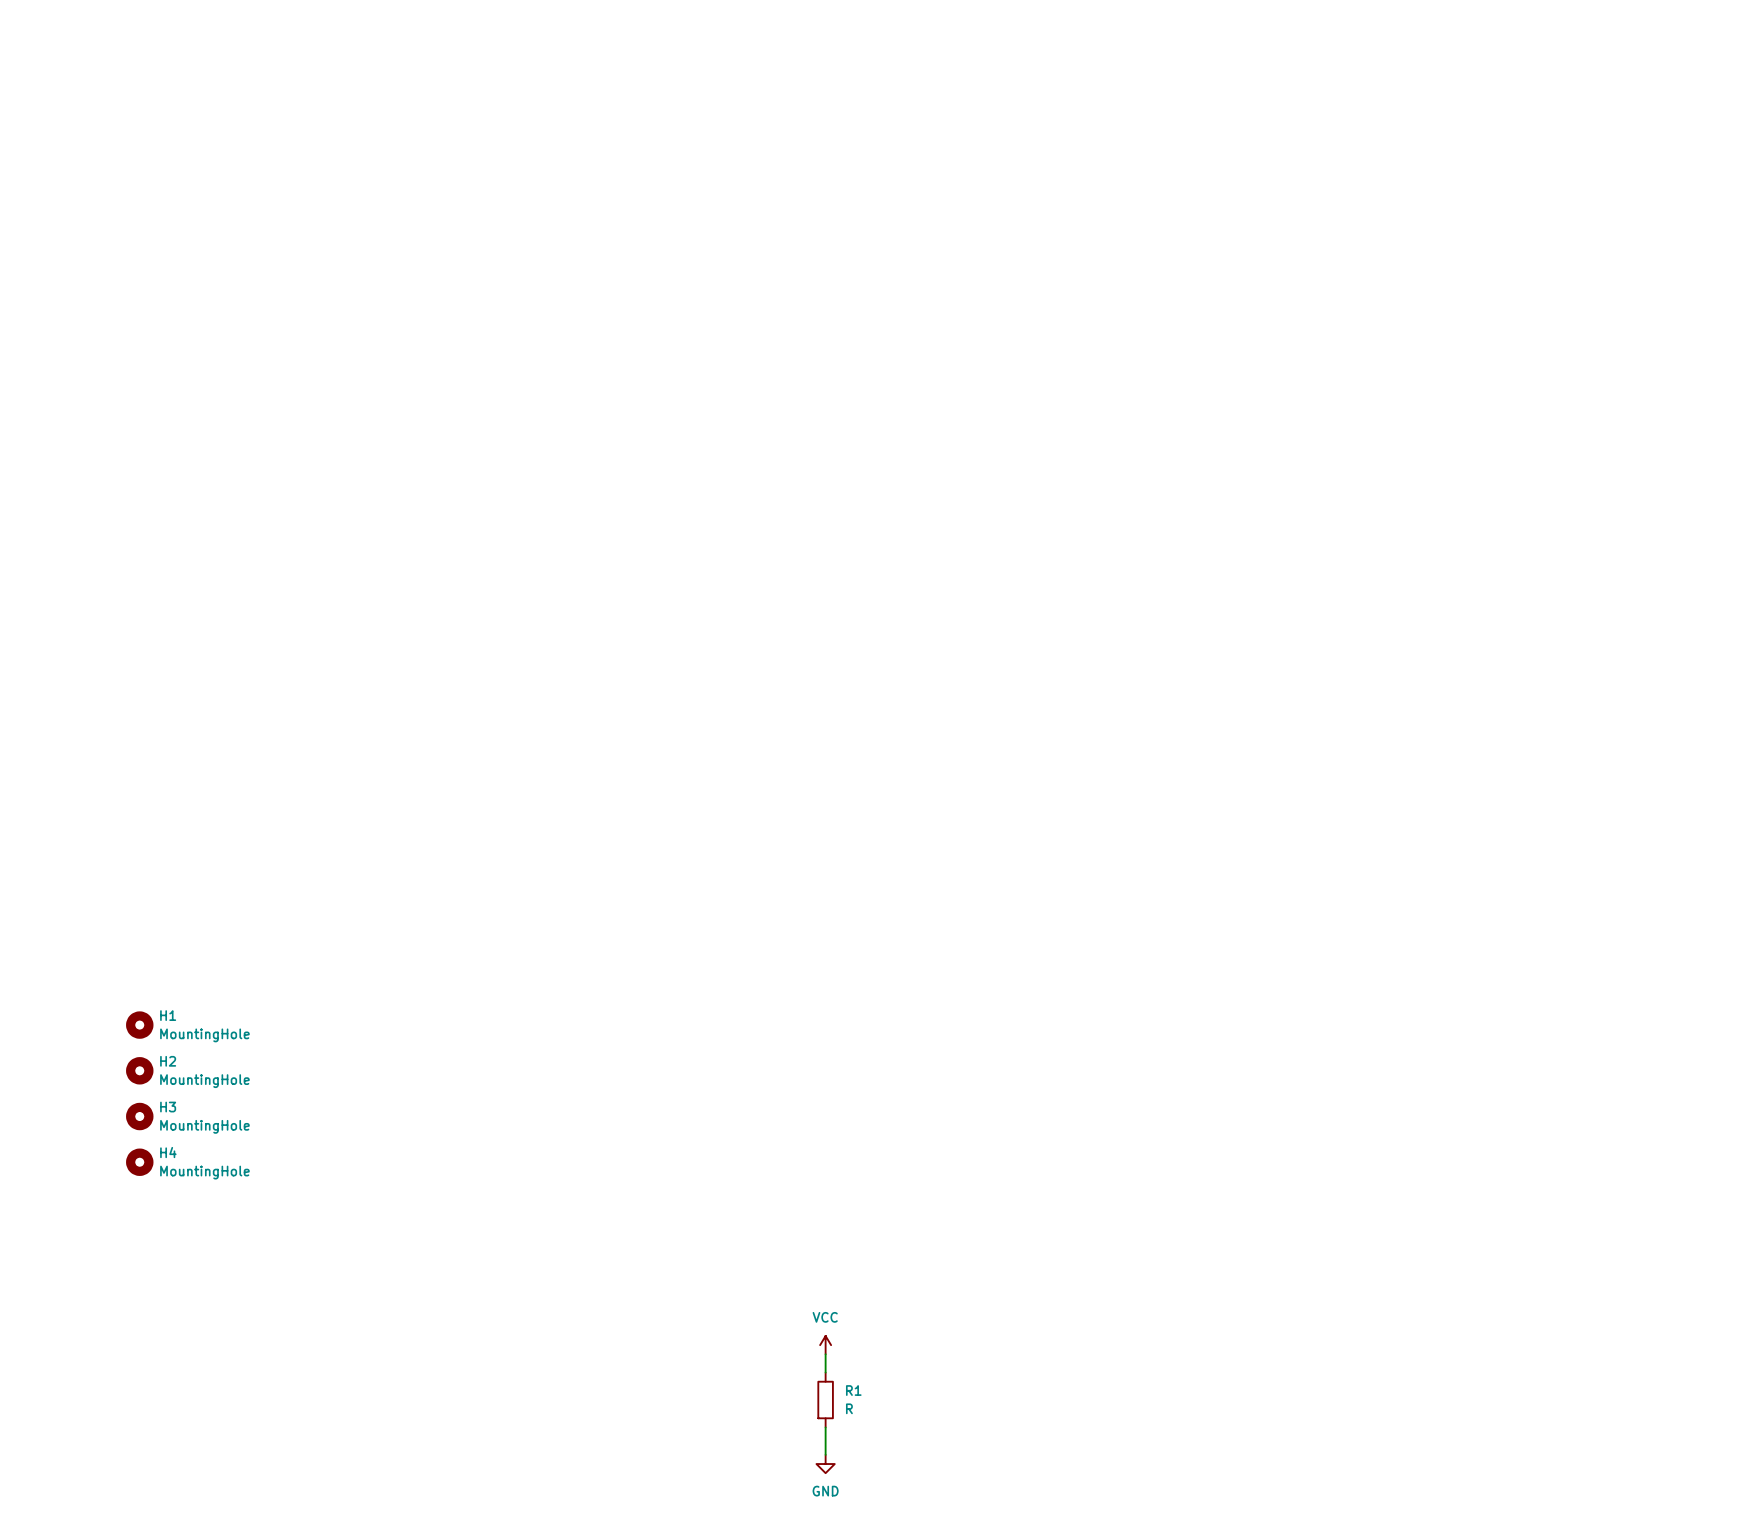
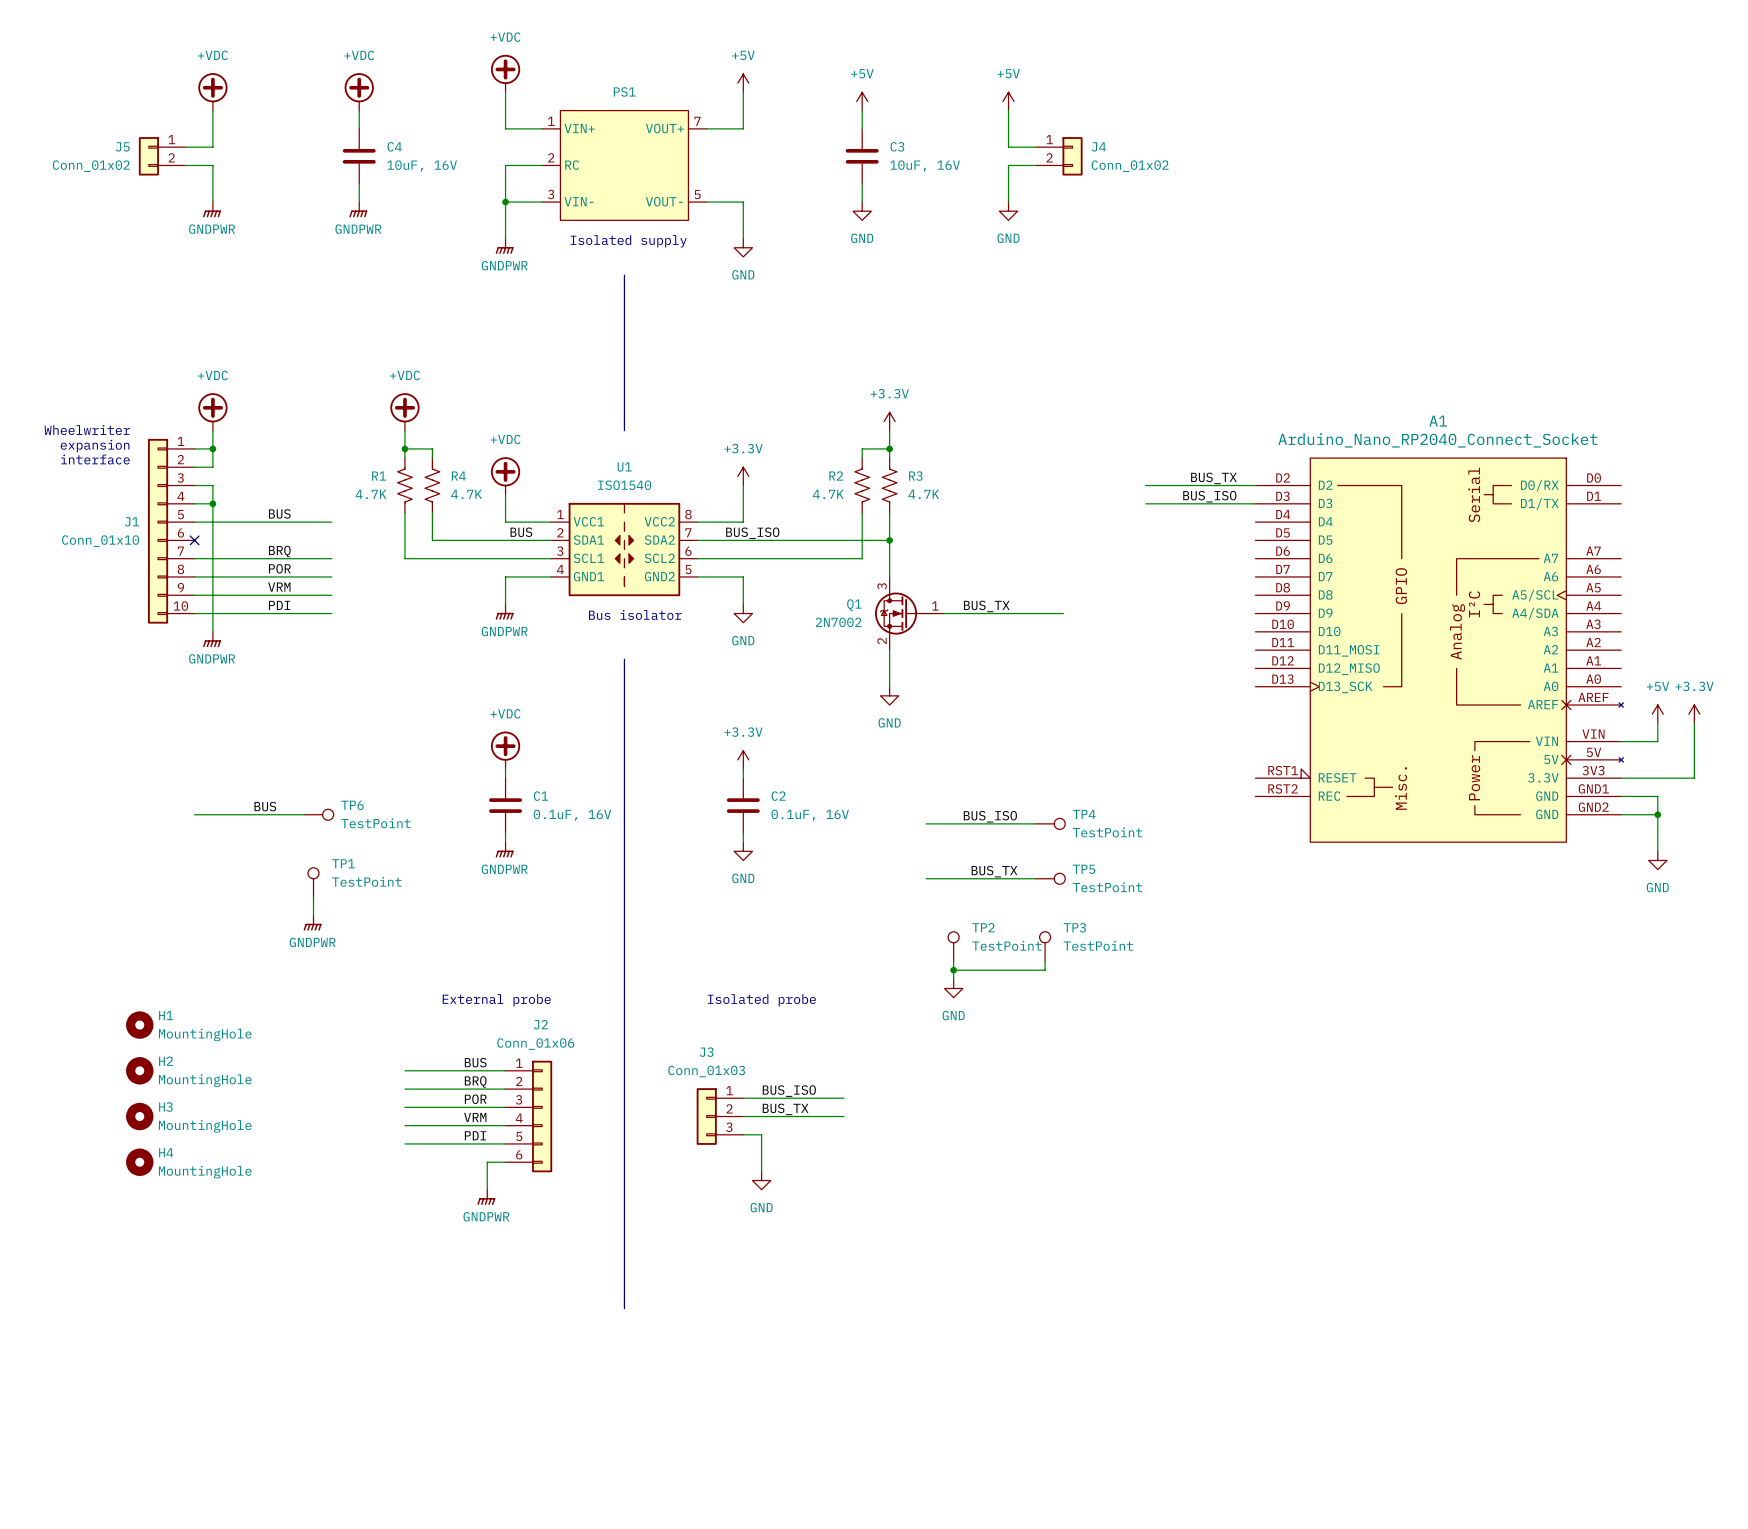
power symbol: none -> +VDC (505, 73)
power symbol: none -> +5V (743, 83)
power symbol: none -> +VDC (212, 91)
power symbol: none -> +VDC (359, 91)
wire: none -> (505, 92) (505, 128) (542, 128)
wire: none -> (743, 92) (743, 128) (706, 128)
power symbol: none -> +5V (862, 101)
power symbol: none -> +5V (1008, 101)
wire: none -> (212, 110) (212, 147) (185, 147)
wire: none -> (359, 110) (359, 128)
wire: none -> (862, 110) (862, 128)
wire: none -> (1008, 110) (1008, 147) (1035, 147)
J5: none -> Conn_01x02 (162, 156)
C4: none -> 10uF, 16V (359, 156)
C3: none -> 10uF, 16V (862, 156)
J4: none -> Conn_01x02 (1059, 156)
wire: none -> (185, 165) (212, 165) (212, 202)
wire: none -> (542, 165) (505, 165) (505, 238)
PS1: none -> (624, 165)
wire: none -> (1035, 165) (1008, 165) (1008, 202)
wire: none -> (359, 183) (359, 202)
wire: none -> (862, 183) (862, 202)
wire: none -> (505, 202) (542, 202)
junction: none -> (505, 202)
wire: none -> (706, 202) (743, 202) (743, 238)
power symbol: none -> GNDPWR (212, 209)
power symbol: none -> GNDPWR (358, 209)
power symbol: none -> GND (862, 211)
power symbol: none -> GND (1008, 211)
text: none -> Isolated supply (628, 241)
power symbol: none -> GNDPWR (504, 246)
power symbol: none -> GND (743, 247)
line: none -> (624, 275) (624, 430)
power symbol: none -> +VDC (212, 411)
power symbol: none -> +VDC (404, 411)
power symbol: none -> +3.3V (889, 421)
text: none -> Wheelwriter (87, 430)
wire: none -> (212, 430) (212, 467) (194, 467)
wire: none -> (404, 430) (404, 458)
wire: none -> (889, 430) (889, 458)
text: none -> expansion (95, 446)
wire: none -> (194, 448) (212, 448)
junction: none -> (212, 448)
wire: none -> (404, 448) (432, 448) (432, 458)
junction: none -> (404, 448)
wire: none -> (889, 448) (862, 448) (862, 458)
junction: none -> (889, 448)
text: none -> interface (95, 459)
power symbol: none -> +VDC (505, 475)
power symbol: none -> +3.3V (743, 476)
label: none -> BUS_TX (1213, 478)
wire: none -> (194, 485) (212, 485) (212, 631)
R4: none -> 4.7K (432, 485)
wire: none -> (743, 485) (743, 522) (697, 522)
R2: none -> 4.7K (862, 485)
R3: none -> 4.7K (889, 485)
wire: none -> (1145, 485) (1255, 485)
wire: none -> (505, 494) (505, 522) (551, 522)
label: none -> BUS_ISO (1209, 496)
wire: none -> (194, 503) (212, 503)
junction: none -> (212, 503)
wire: none -> (1145, 503) (1255, 503)
wire: none -> (404, 512) (404, 558) (551, 558)
wire: none -> (432, 512) (432, 540) (551, 540)
wire: none -> (862, 512) (862, 558) (697, 558)
wire: none -> (889, 512) (889, 576)
label: none -> BUS (279, 513)
wire: none -> (194, 522) (331, 522)
J1: none -> Conn_01x10 (171, 531)
label: none -> BUS (521, 532)
label: none -> BUS_ISO (752, 533)
no-connect mark: none -> (194, 540)
wire: none -> (697, 540) (889, 540)
junction: none -> (889, 540)
U1: none -> ISO1540 (624, 549)
label: none -> BRQ (279, 551)
wire: none -> (194, 558) (331, 558)
label: none -> POR (279, 568)
wire: none -> (194, 576) (331, 576)
wire: none -> (551, 576) (505, 576) (505, 604)
wire: none -> (697, 576) (743, 576) (743, 604)
label: none -> VRM (279, 587)
wire: none -> (194, 595) (331, 595)
label: none -> PDI (279, 605)
label: none -> BUS_TX (986, 606)
power symbol: none -> GNDPWR (504, 612)
wire: none -> (194, 613) (331, 613)
power symbol: none -> GND (743, 613)
Q1: none -> 2N7002 (909, 613)
wire: none -> (944, 613) (1063, 613)
text: none -> Bus isolator (635, 614)
power symbol: none -> GNDPWR (212, 639)
wire: none -> (889, 650) (889, 686)
A1: none -> Arduino_Nano_RP2040_Connect_Socket (1439, 650)
line: none -> (624, 659) (624, 1308)
power symbol: none -> GND (889, 695)
power symbol: none -> +5V (1657, 714)
power symbol: none -> +3.3V (1694, 714)
wire: none -> (1657, 723) (1657, 741) (1621, 741)
wire: none -> (1694, 723) (1694, 778) (1621, 778)
power symbol: none -> +VDC (505, 750)
power symbol: none -> +3.3V (743, 759)
wire: none -> (505, 769) (505, 778)
wire: none -> (743, 769) (743, 778)
wire: none -> (1621, 796) (1657, 796) (1657, 851)
C1: none -> 0.1uF, 16V (505, 805)
C2: none -> 0.1uF, 16V (743, 805)
label: none -> BUS (265, 806)
wire: none -> (194, 814) (304, 814)
TP6: none -> TestPoint (319, 814)
wire: none -> (1621, 814) (1657, 814)
junction: none -> (1657, 814)
label: none -> BUS_ISO (990, 816)
wire: none -> (926, 823) (1035, 823)
TP4: none -> TestPoint (1050, 823)
wire: none -> (505, 833) (505, 842)
wire: none -> (743, 833) (743, 842)
power symbol: none -> GNDPWR (504, 849)
power symbol: none -> GND (743, 851)
power symbol: none -> GND (1657, 860)
label: none -> BUS_TX (994, 871)
wire: none -> (926, 878) (1035, 878)
TP5: none -> TestPoint (1050, 878)
TP1: none -> TestPoint (313, 882)
wire: none -> (313, 897) (313, 915)
power symbol: none -> GNDPWR (312, 923)
TP2: none -> TestPoint (953, 946)
TP3: none -> TestPoint (1045, 946)
wire: none -> (953, 961) (953, 979)
wire: none -> (1045, 961) (1045, 970) (953, 970)
junction: none -> (953, 970)
power symbol: none -> GND (953, 988)
text: none -> External probe (496, 1000)
text: none -> Isolated probe (761, 1000)
label: none -> BUS (475, 1062)
wire: none -> (404, 1070) (505, 1070)
label: none -> BRQ (475, 1081)
wire: none -> (404, 1089) (505, 1089)
label: none -> BUS_ISO (789, 1091)
wire: none -> (743, 1098) (843, 1098)
label: none -> POR (475, 1099)
wire: none -> (404, 1107) (505, 1107)
label: none -> BUS_TX (785, 1109)
J2: none -> Conn_01x06 (528, 1116)
J3: none -> Conn_01x03 (719, 1116)
wire: none -> (743, 1116) (843, 1116)
label: none -> VRM (475, 1117)
wire: none -> (404, 1125) (505, 1125)
wire: none -> (743, 1134) (761, 1134) (761, 1171)
label: none -> PDI (475, 1135)
wire: none -> (404, 1143) (505, 1143)
wire: none -> (505, 1162) (487, 1162) (487, 1189)
power symbol: none -> GND (761, 1180)
power symbol: none -> GNDPWR (486, 1197)
power symbol: VCC (825, 1345) -> none
wire: (825, 1354) (825, 1372) -> none
R1 symbol: [817, 1372, 834, 1428] -> [397, 458, 413, 513]
R1 name position: R1 (853, 1390) -> R1 (379, 476)
R1 value: R (849, 1408) -> 4.7K (371, 494)
wire: (825, 1427) (825, 1454) -> none
power symbol: GND (825, 1464) -> none

